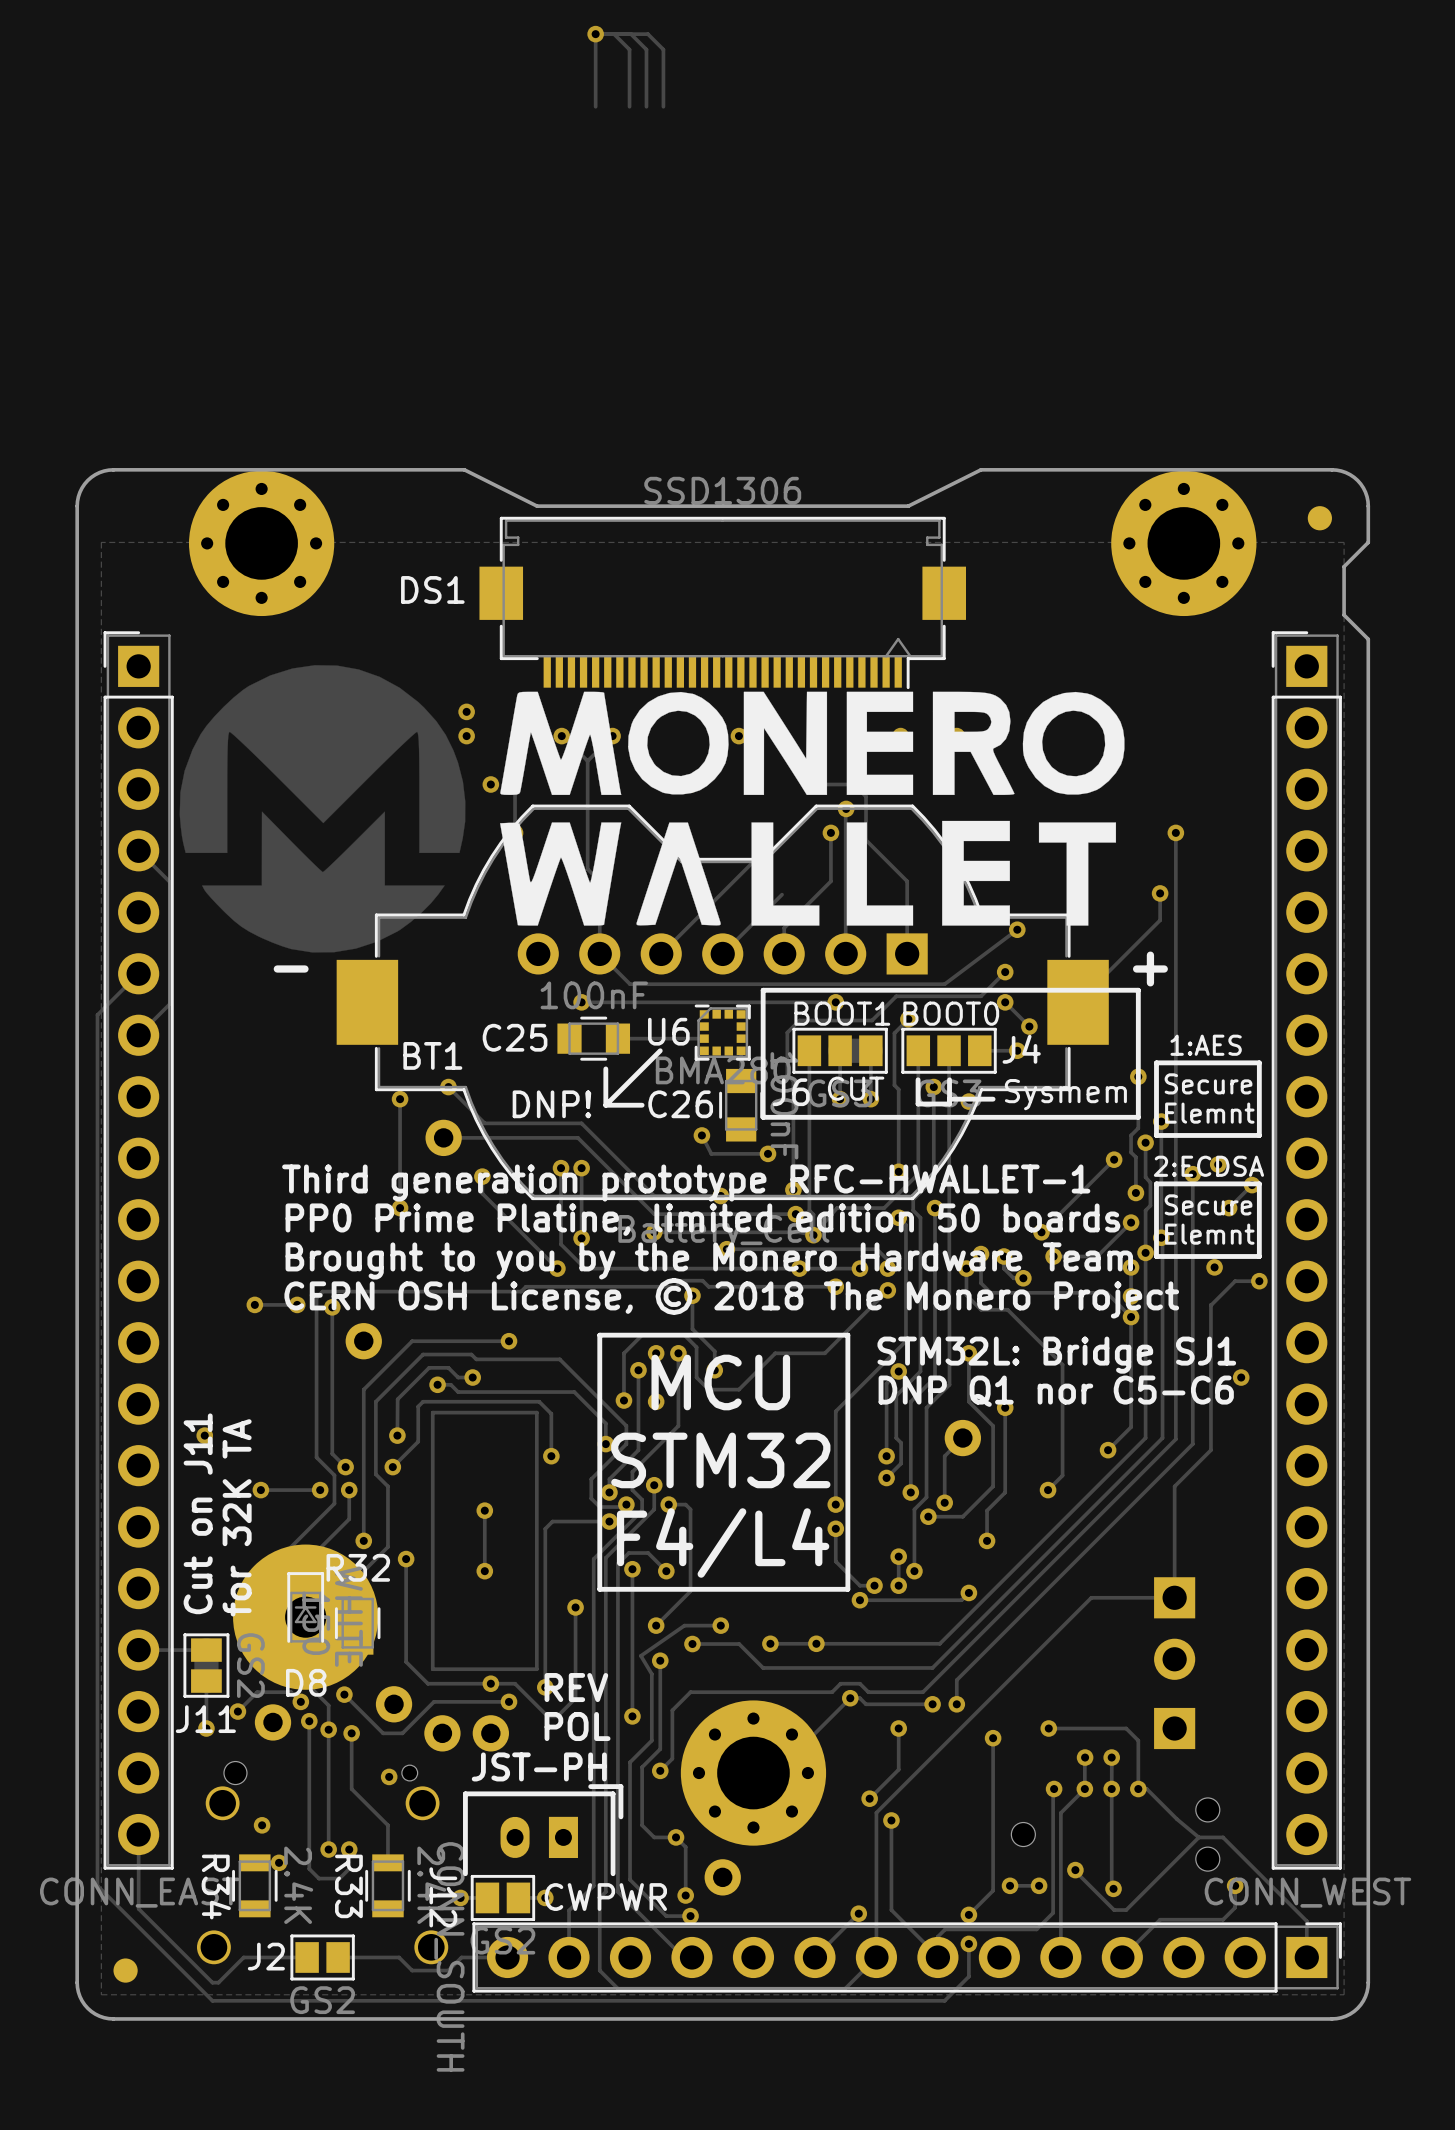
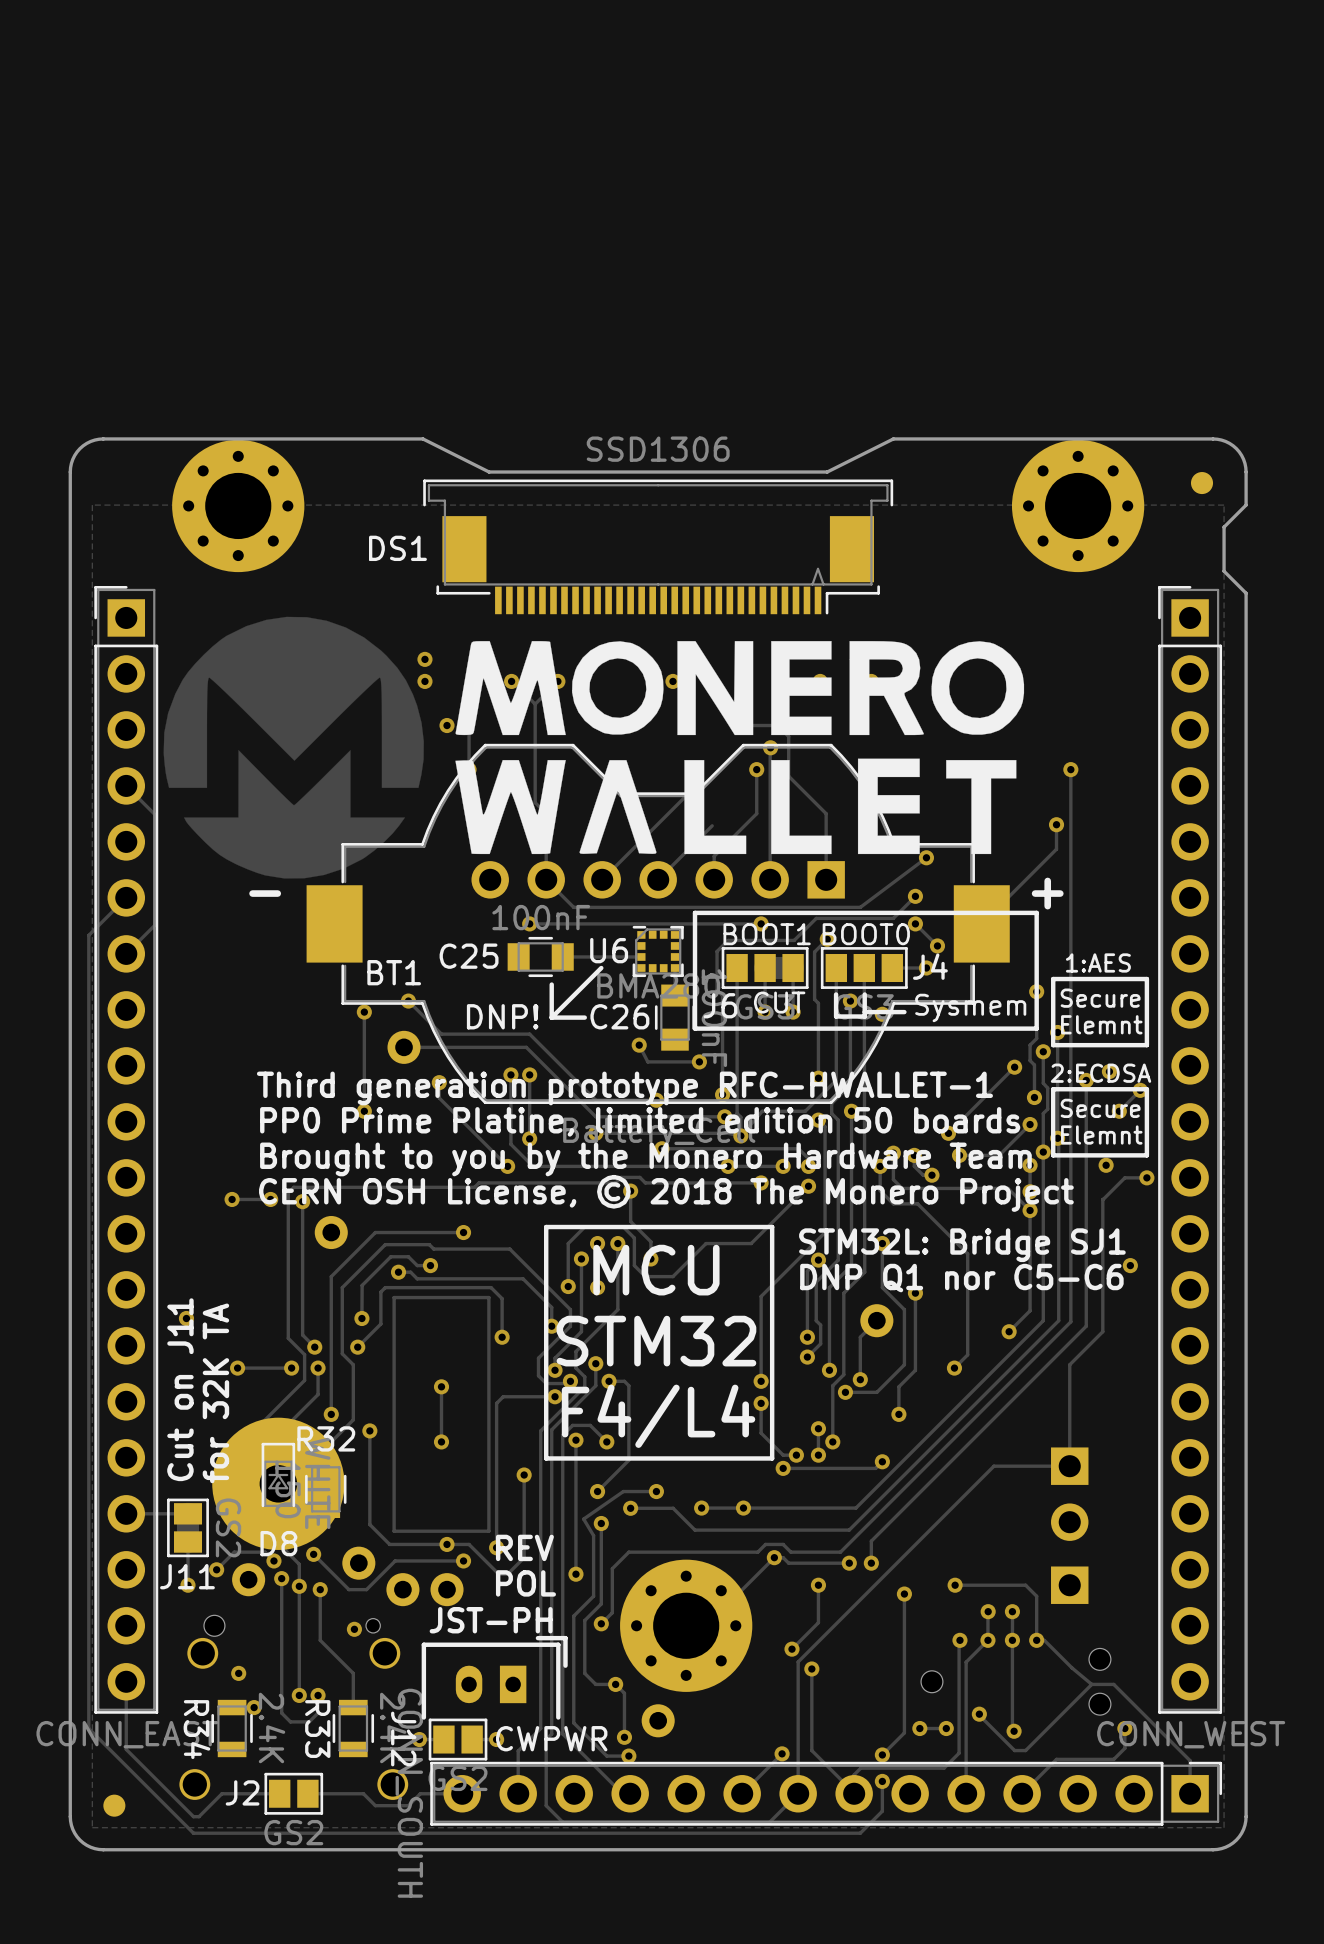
via: (595, 34) -> none
track: (614, 34) (629, 49) (629, 106) -> none
track: (630, 34) (646, 49) (646, 106) -> none
track: (663, 106) (663, 49) (647, 34) (595, 34) (595, 106) -> none
DS1 footprint: [479, 516, 966, 690] -> [423, 479, 894, 615]

